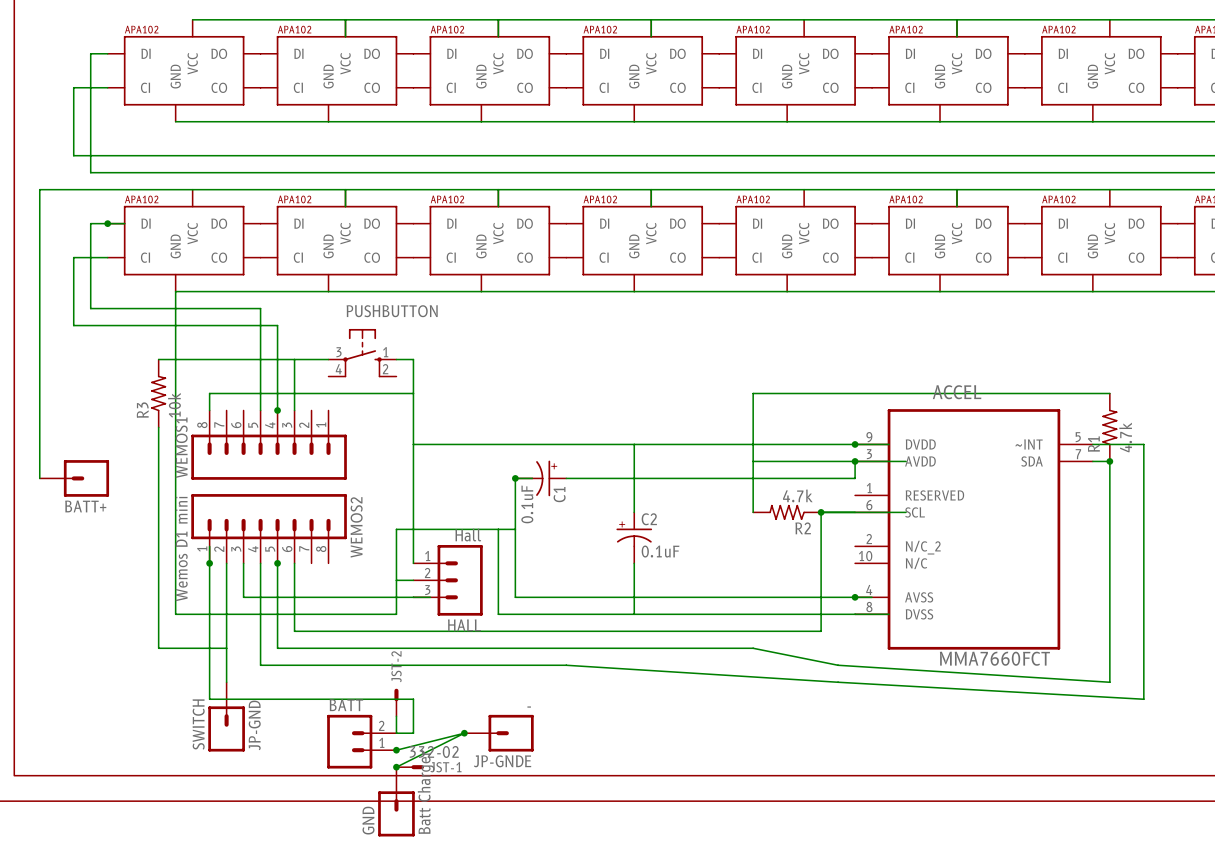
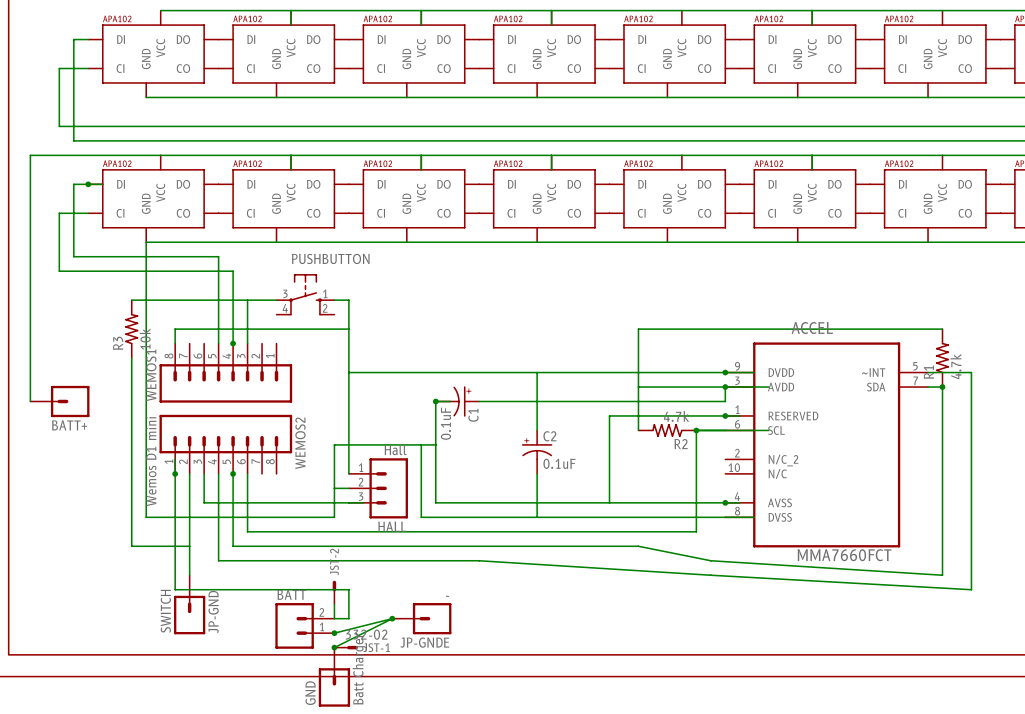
junction: none -> (725, 415)
wire: none -> (739, 415) (609, 415) (609, 502)

